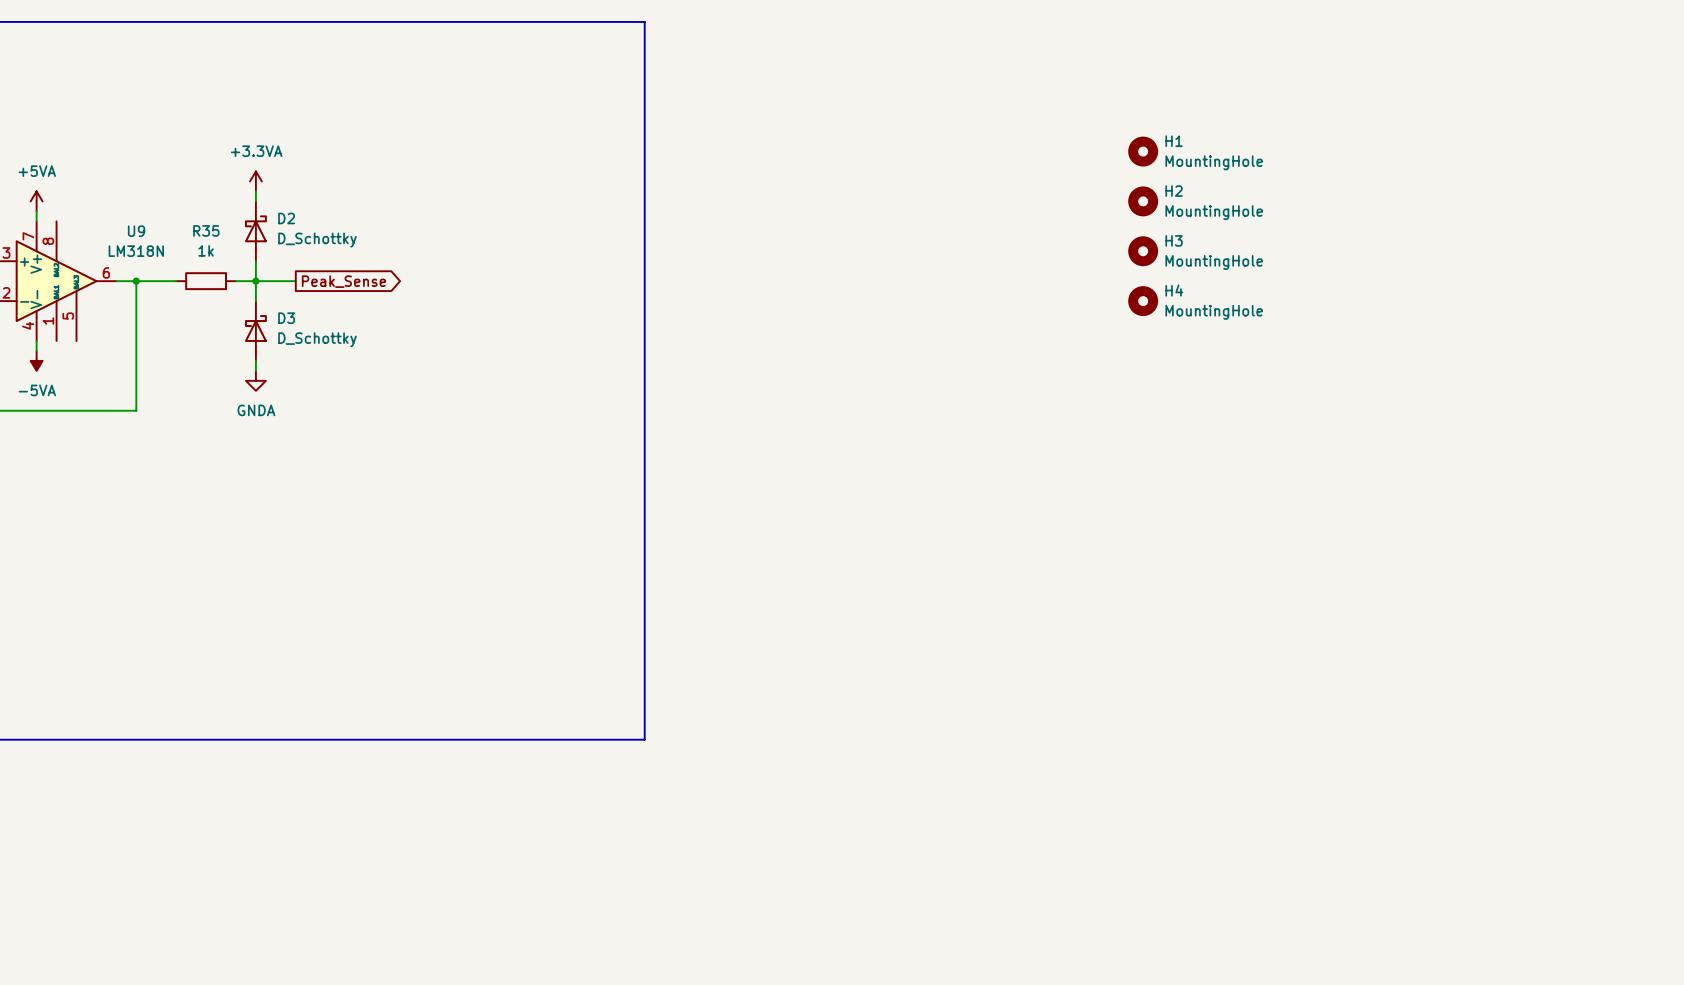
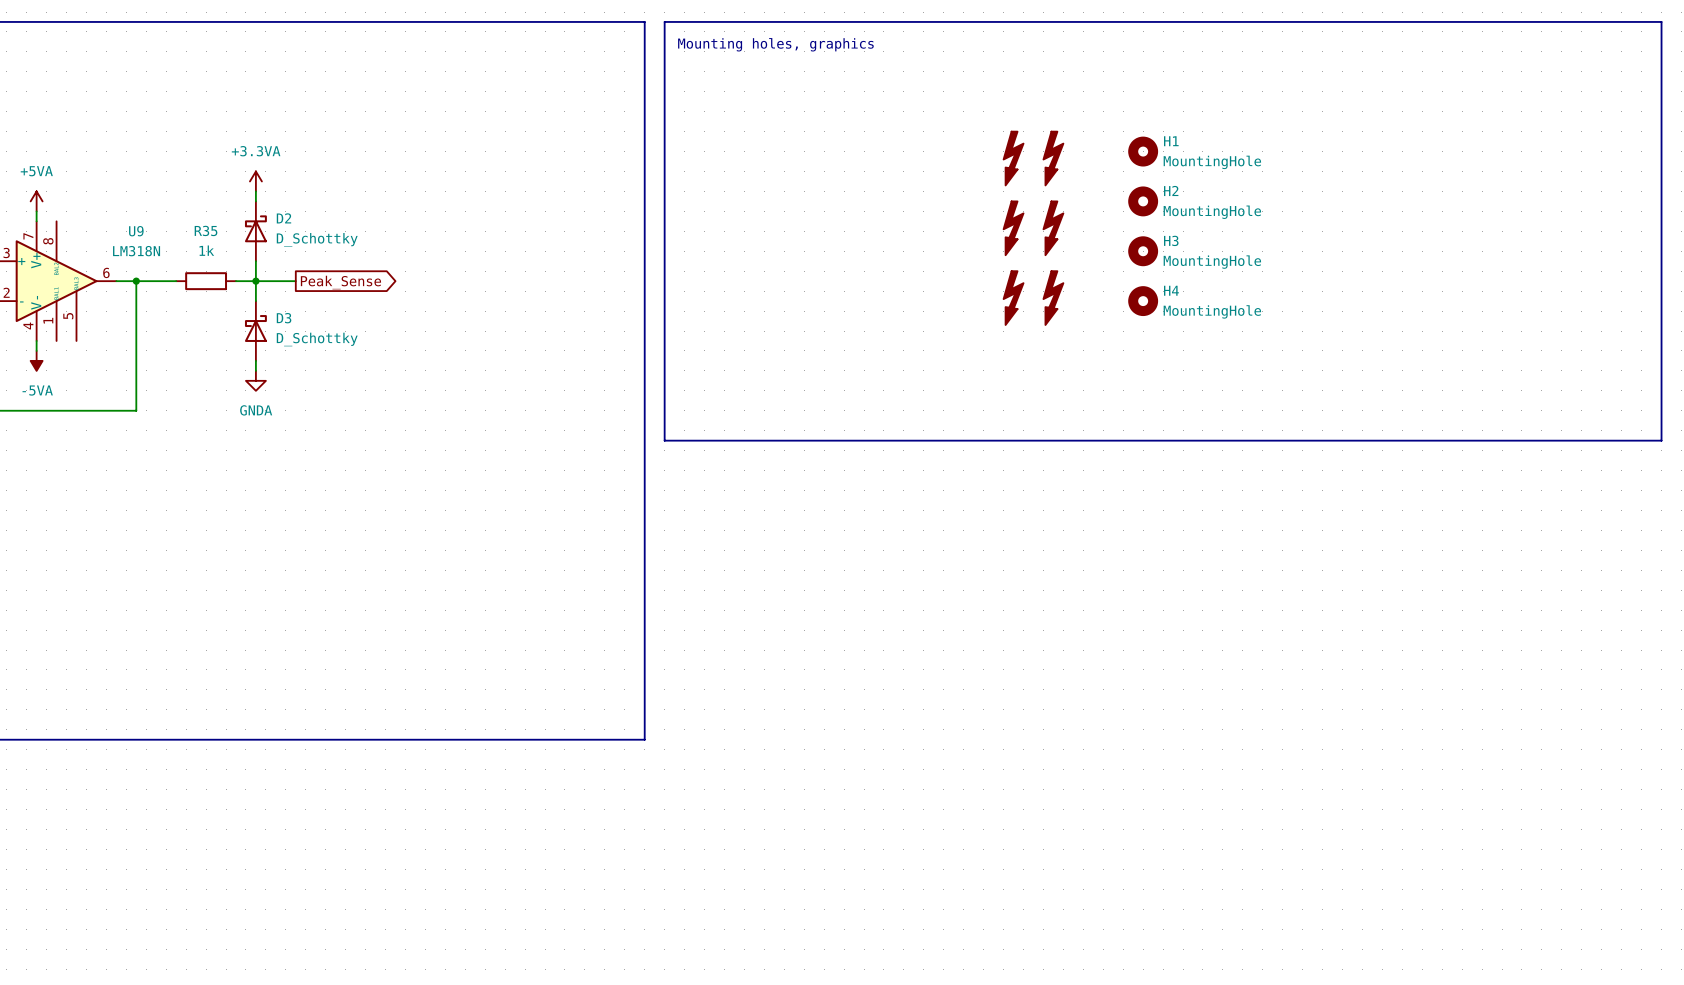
line: none -> (664, 21) (1661, 21) (1661, 440) (664, 440) (664, 21)
text: none -> Mounting holes, graphics (775, 44)
part: none -> (1013, 158)
part: none -> (1053, 158)
part: none -> (1013, 228)
part: none -> (1053, 228)
part: none -> (1013, 298)
part: none -> (1053, 298)

